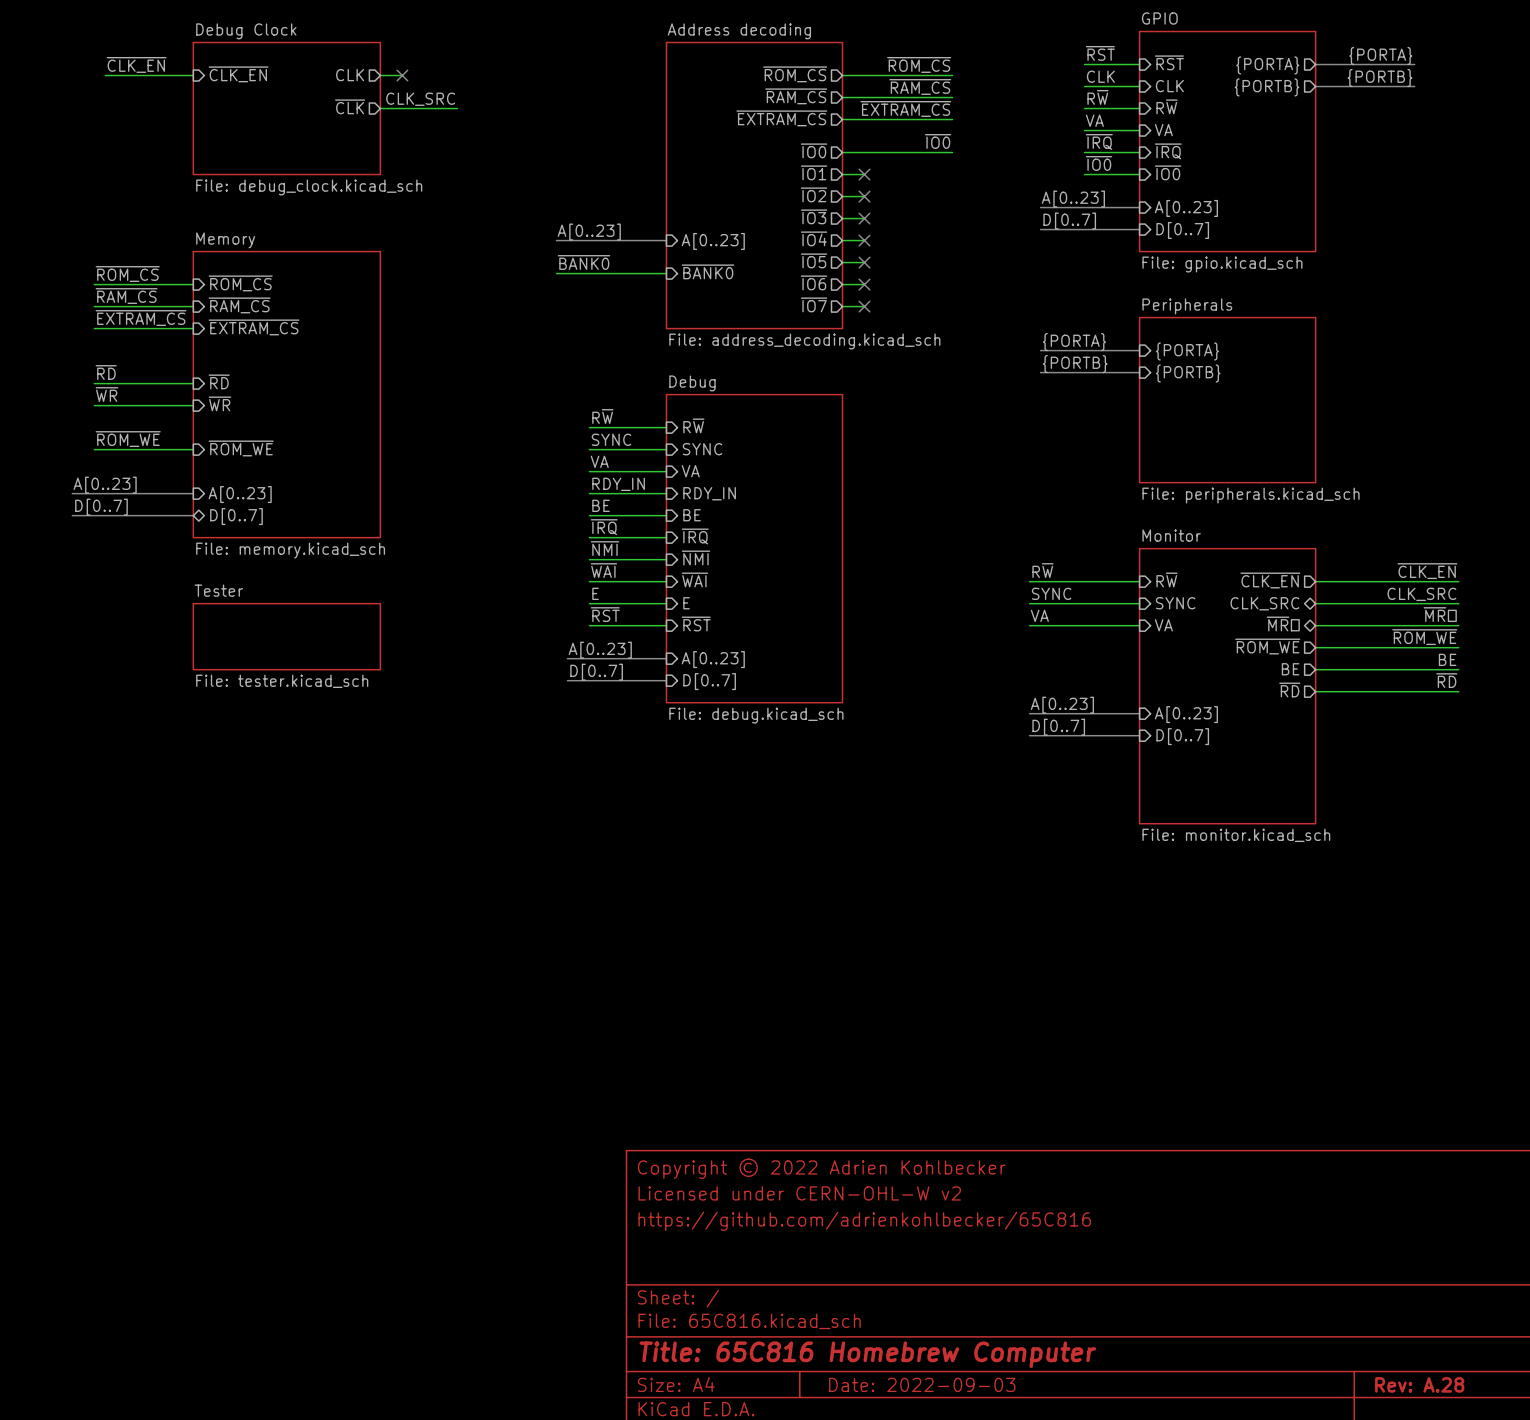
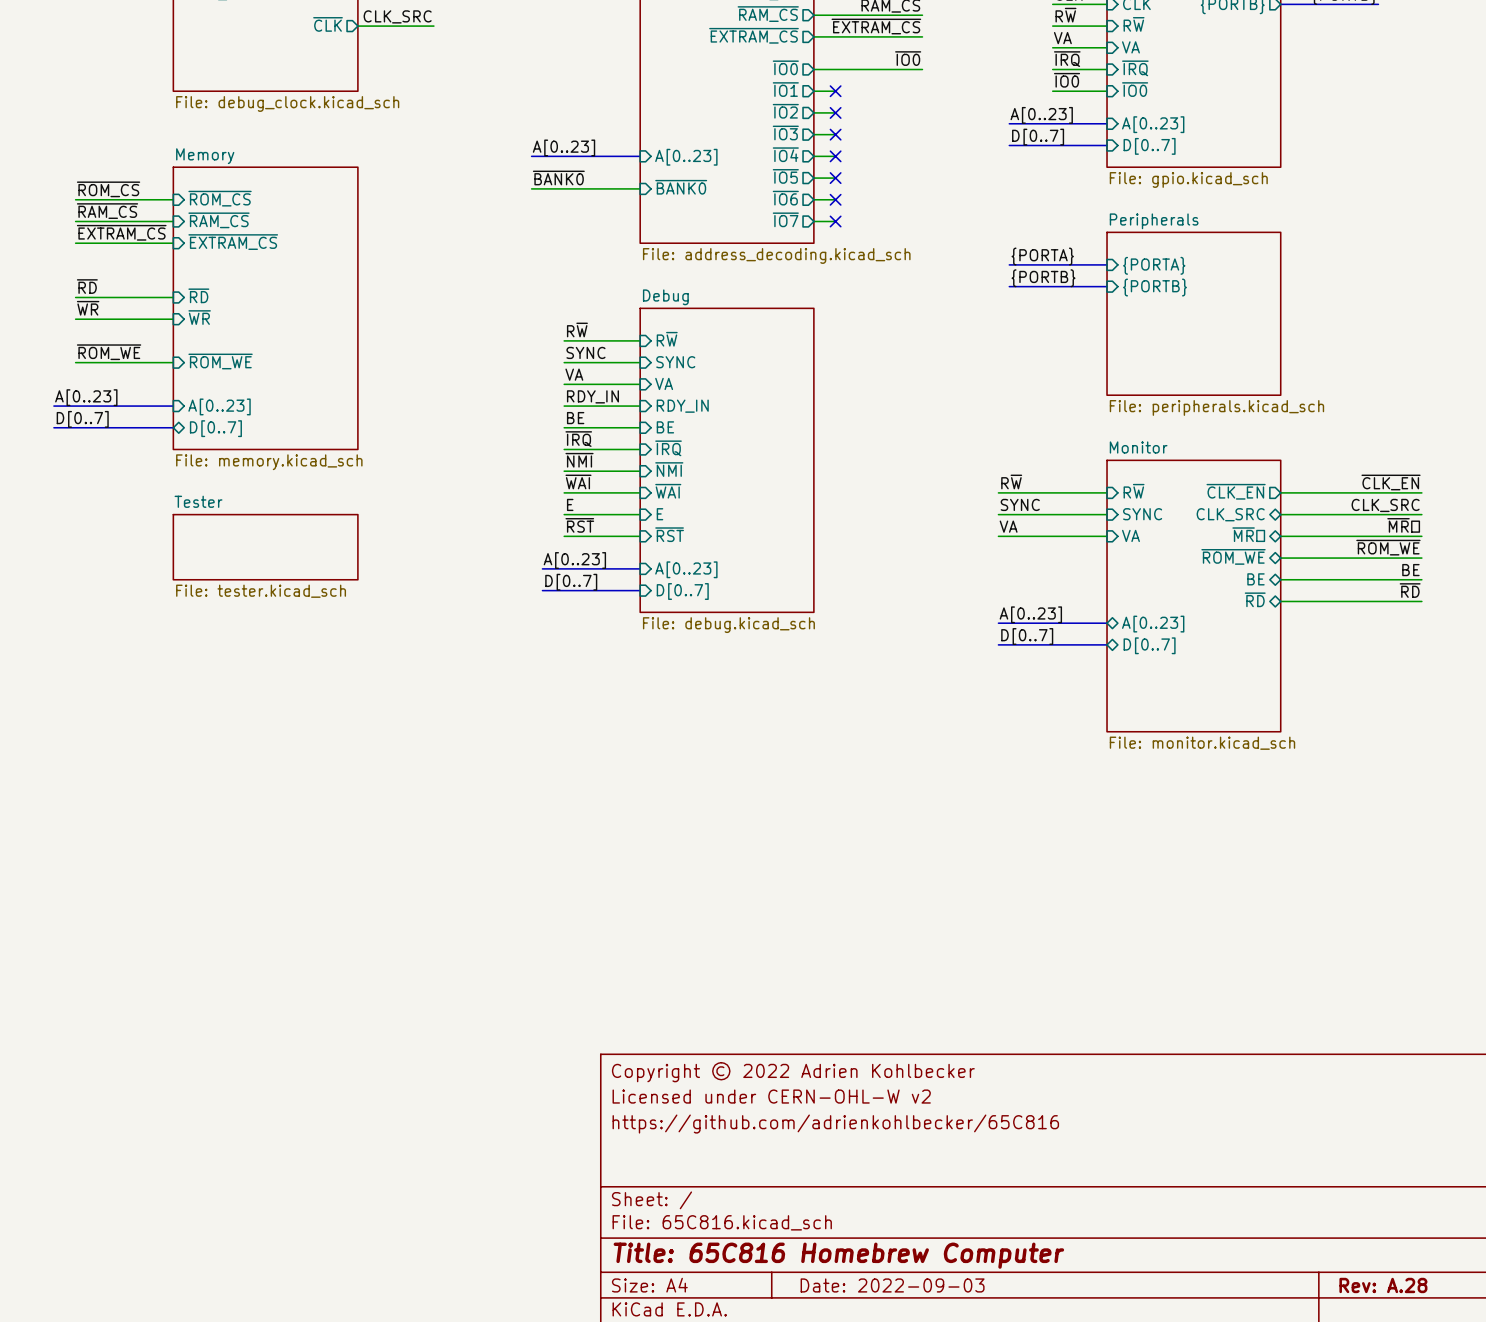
sheet pin shape: output (1267, 646) -> bidirectional (1233, 556)
sheet pin shape: output (1290, 669) -> bidirectional (1255, 579)
sheet pin shape: output (1289, 690) -> bidirectional (1255, 599)
sheet pin shape: input (1186, 714) -> bidirectional (1153, 624)
sheet pin shape: input (1182, 736) -> bidirectional (1149, 645)

